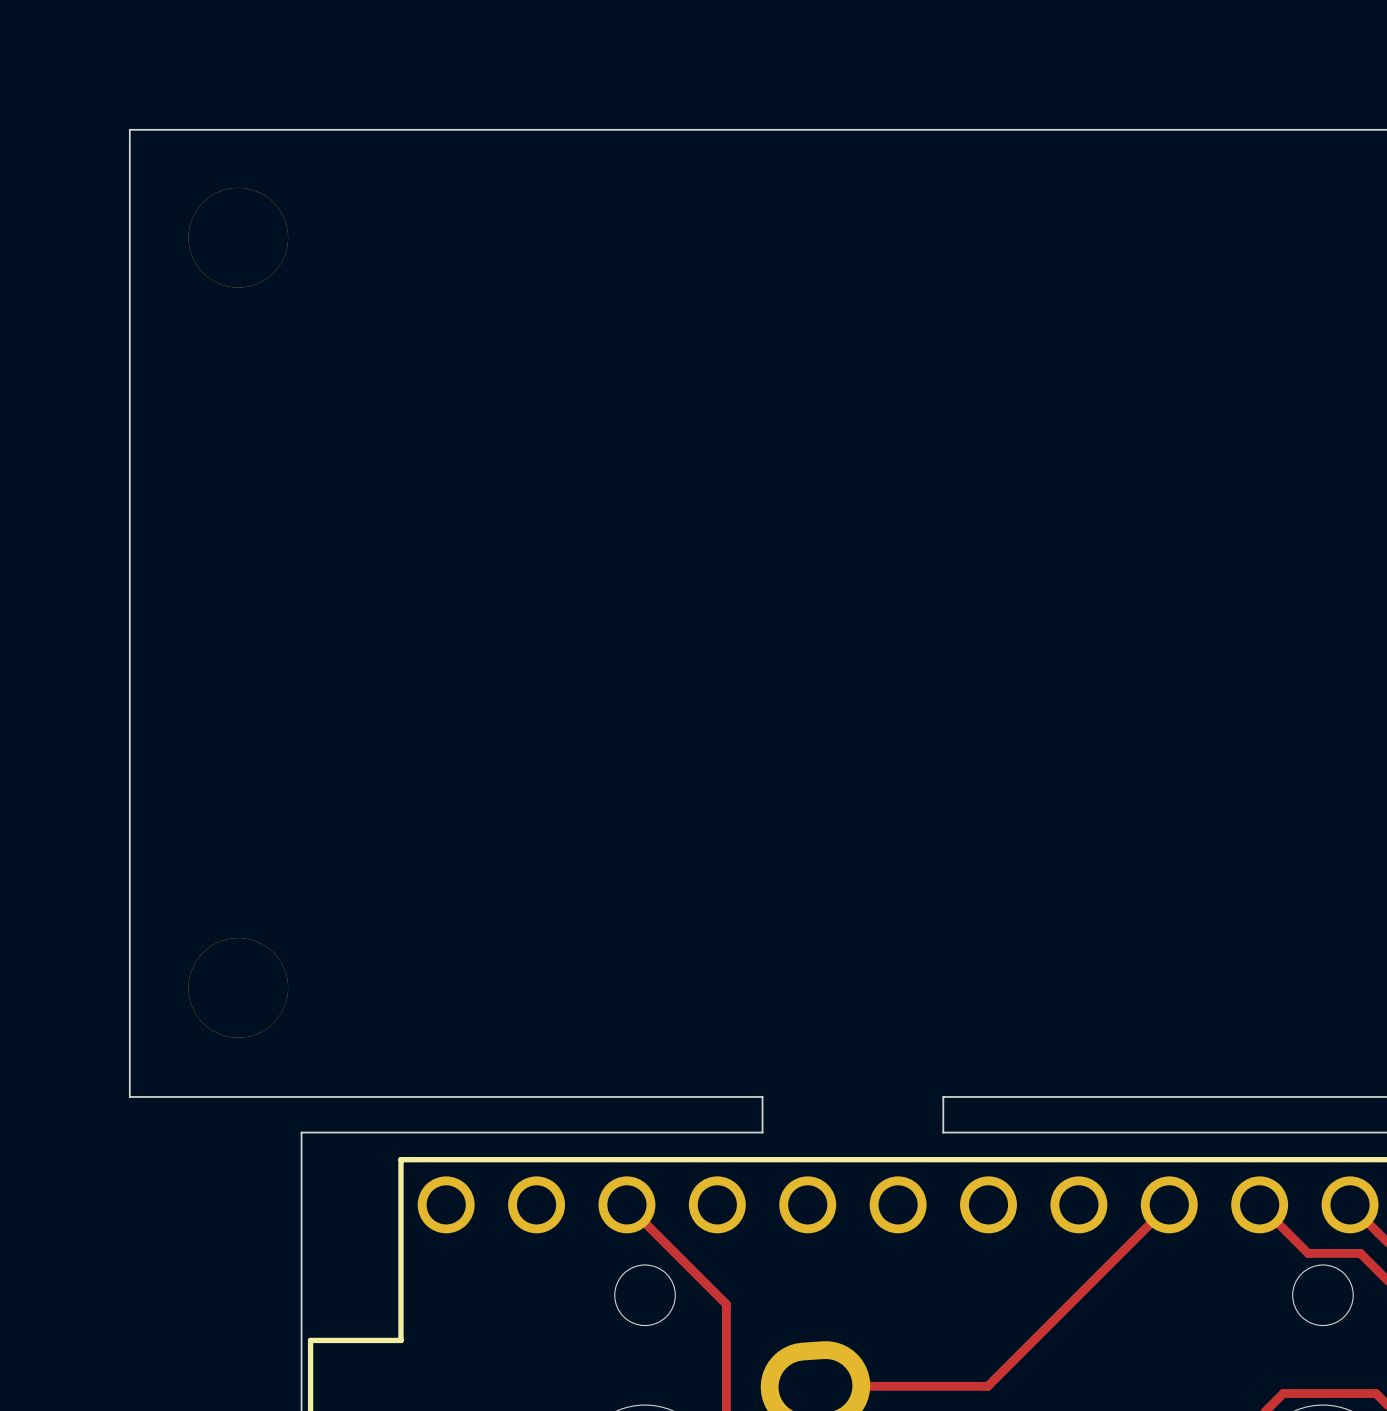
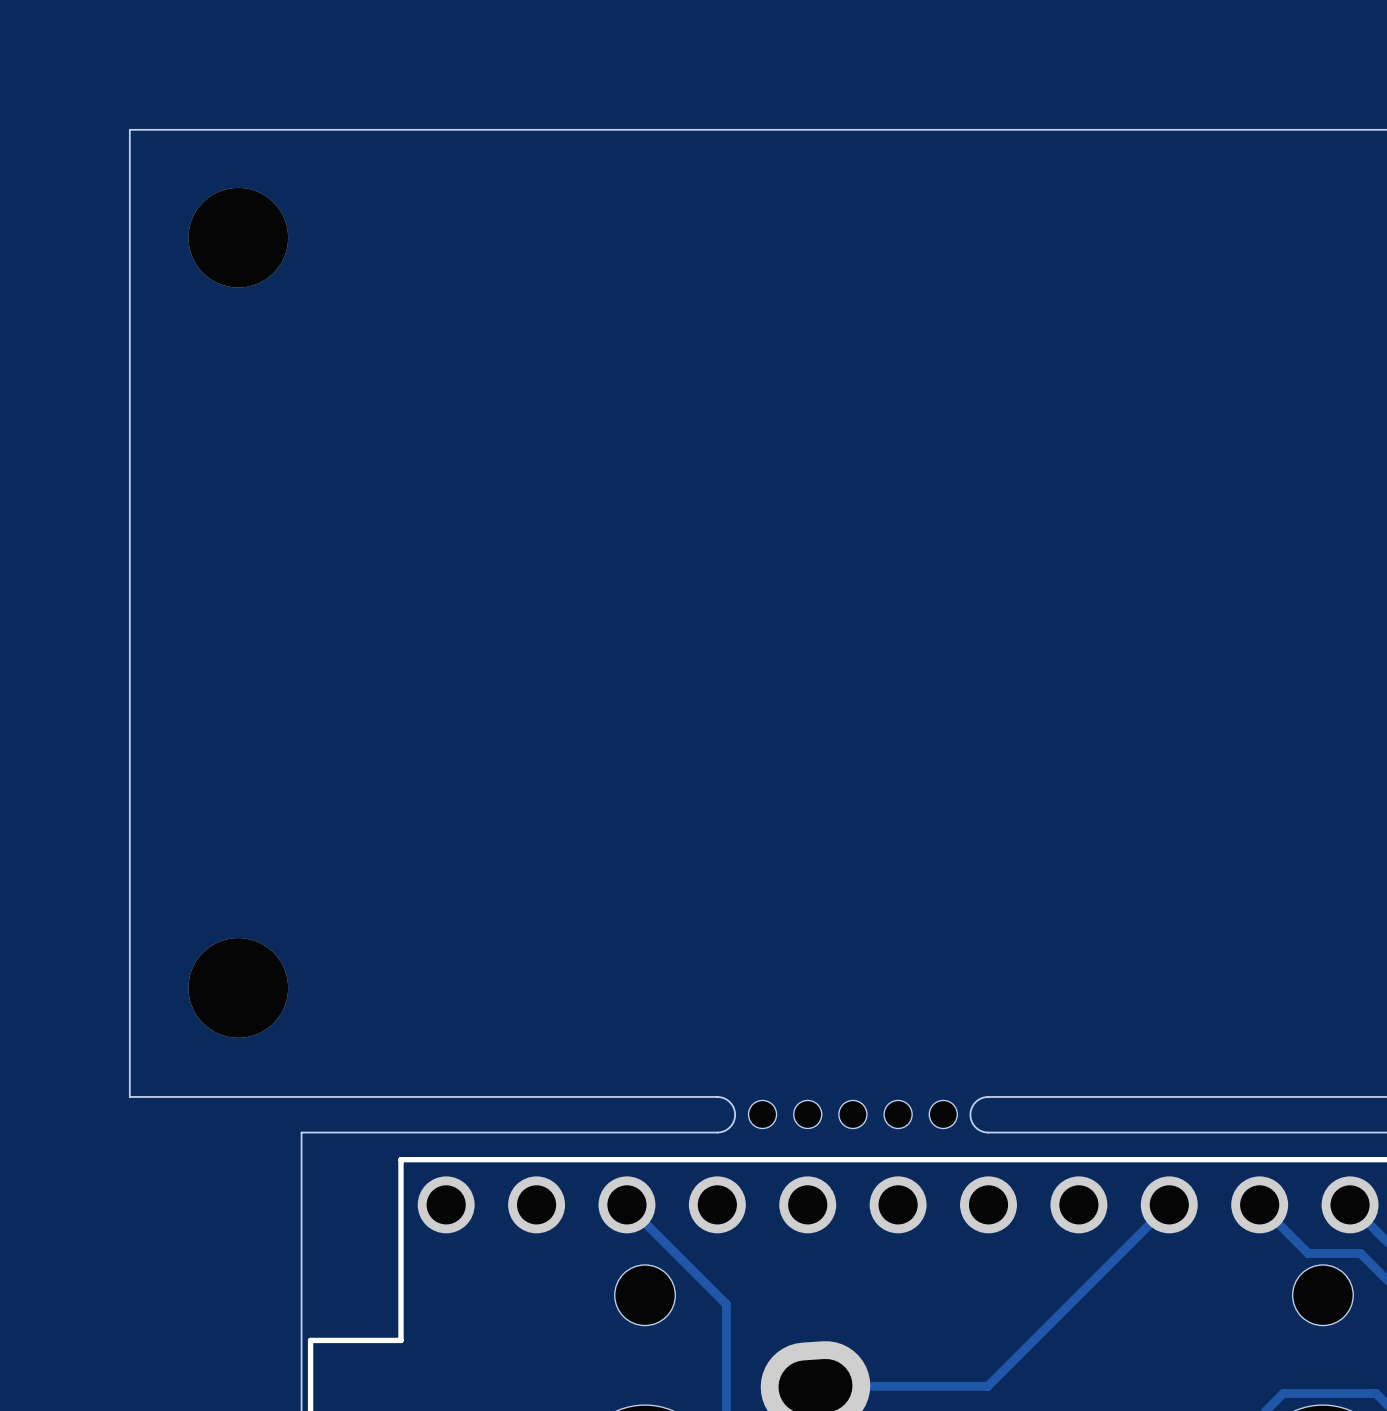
board edge: (717, 1096) (762, 1096) (762, 1132) (717, 1132) -> (717, 1096) (729, 1102) (735, 1114) (729, 1127) (717, 1132)
board edge: (988, 1096) (943, 1096) (943, 1132) (988, 1132) -> (988, 1096) (975, 1102) (970, 1114) (975, 1127) (988, 1132)
part: none -> (852, 1114)

